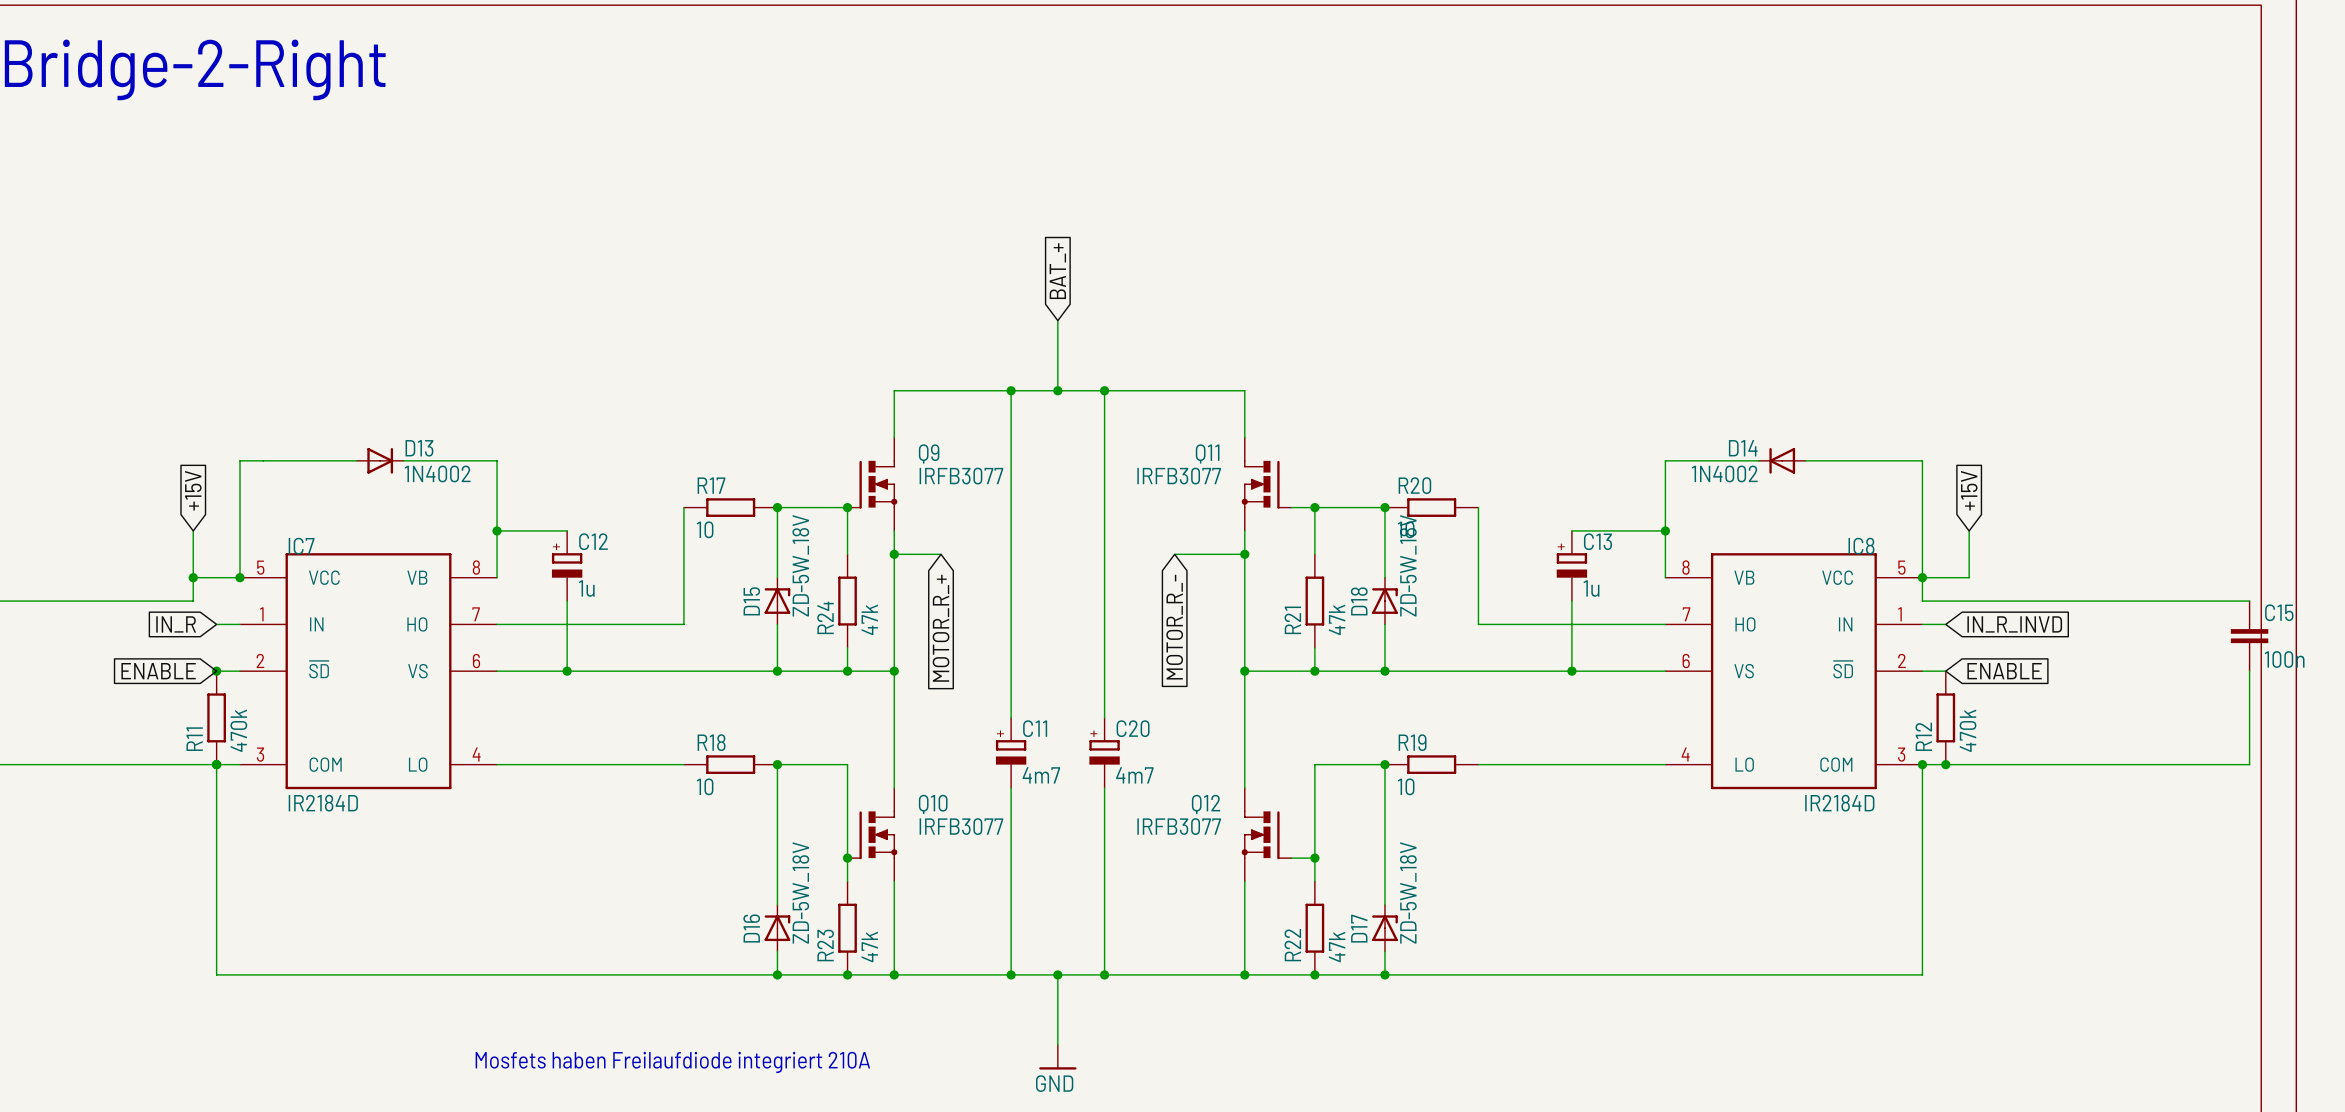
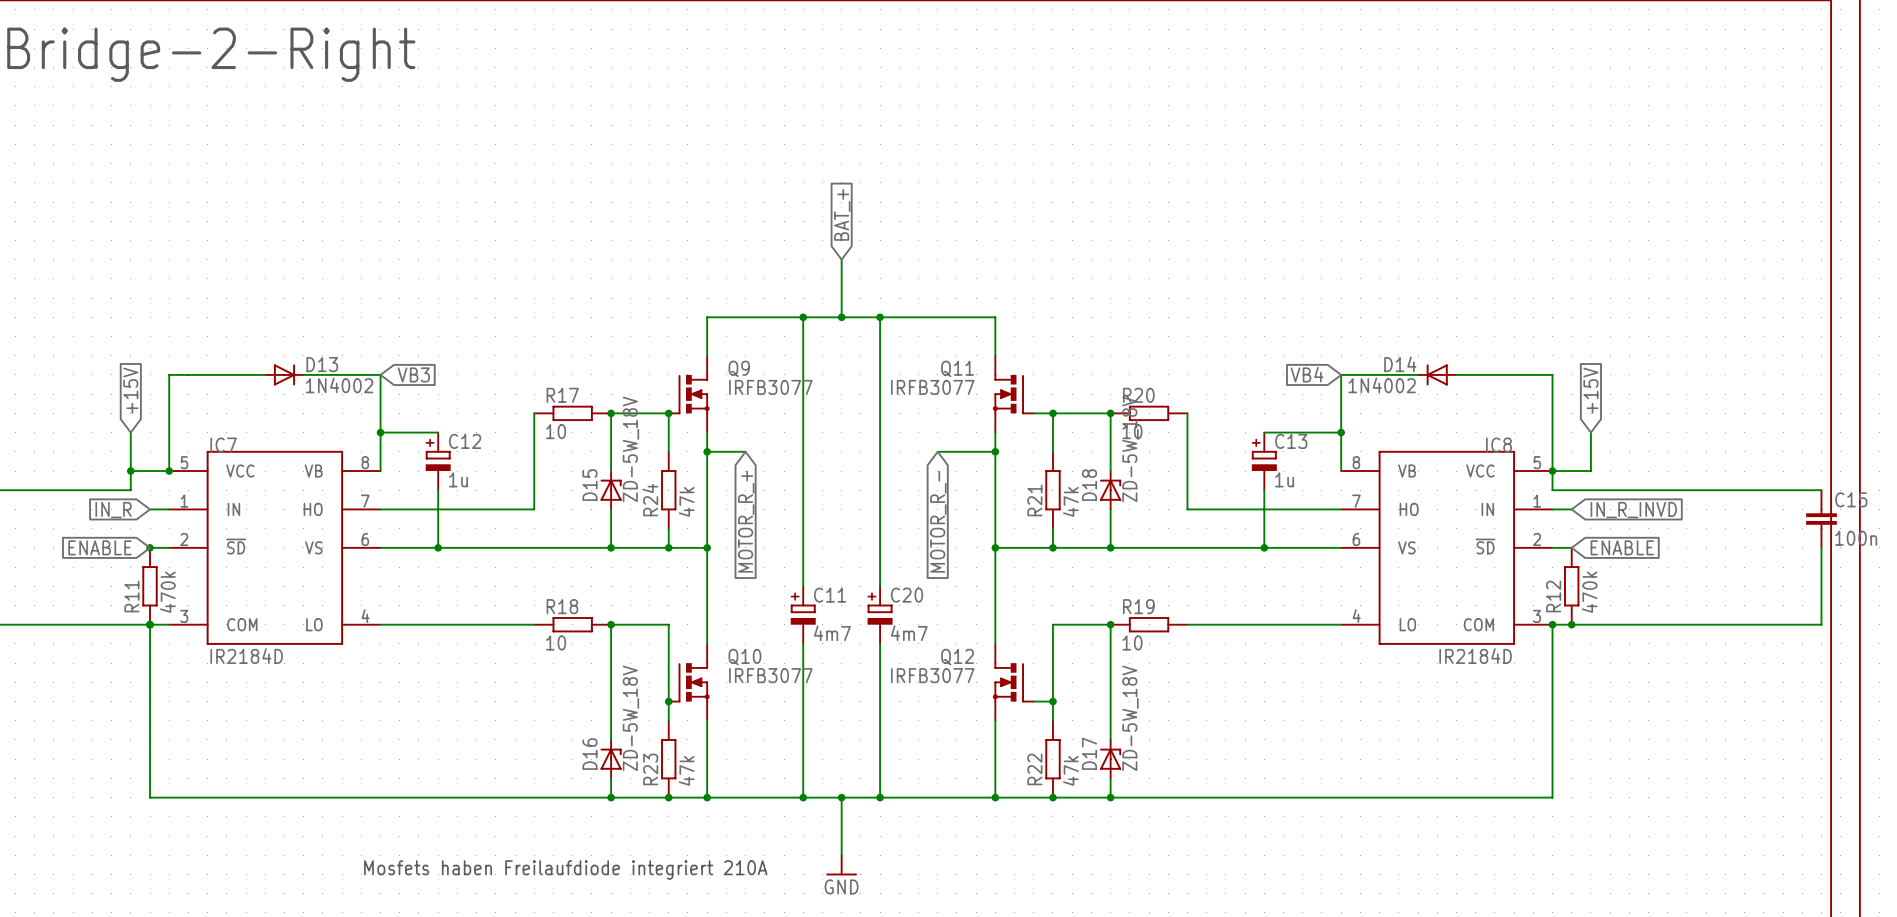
global label: none -> VB3 (413, 374)
global label: none -> VB4 (1307, 374)

